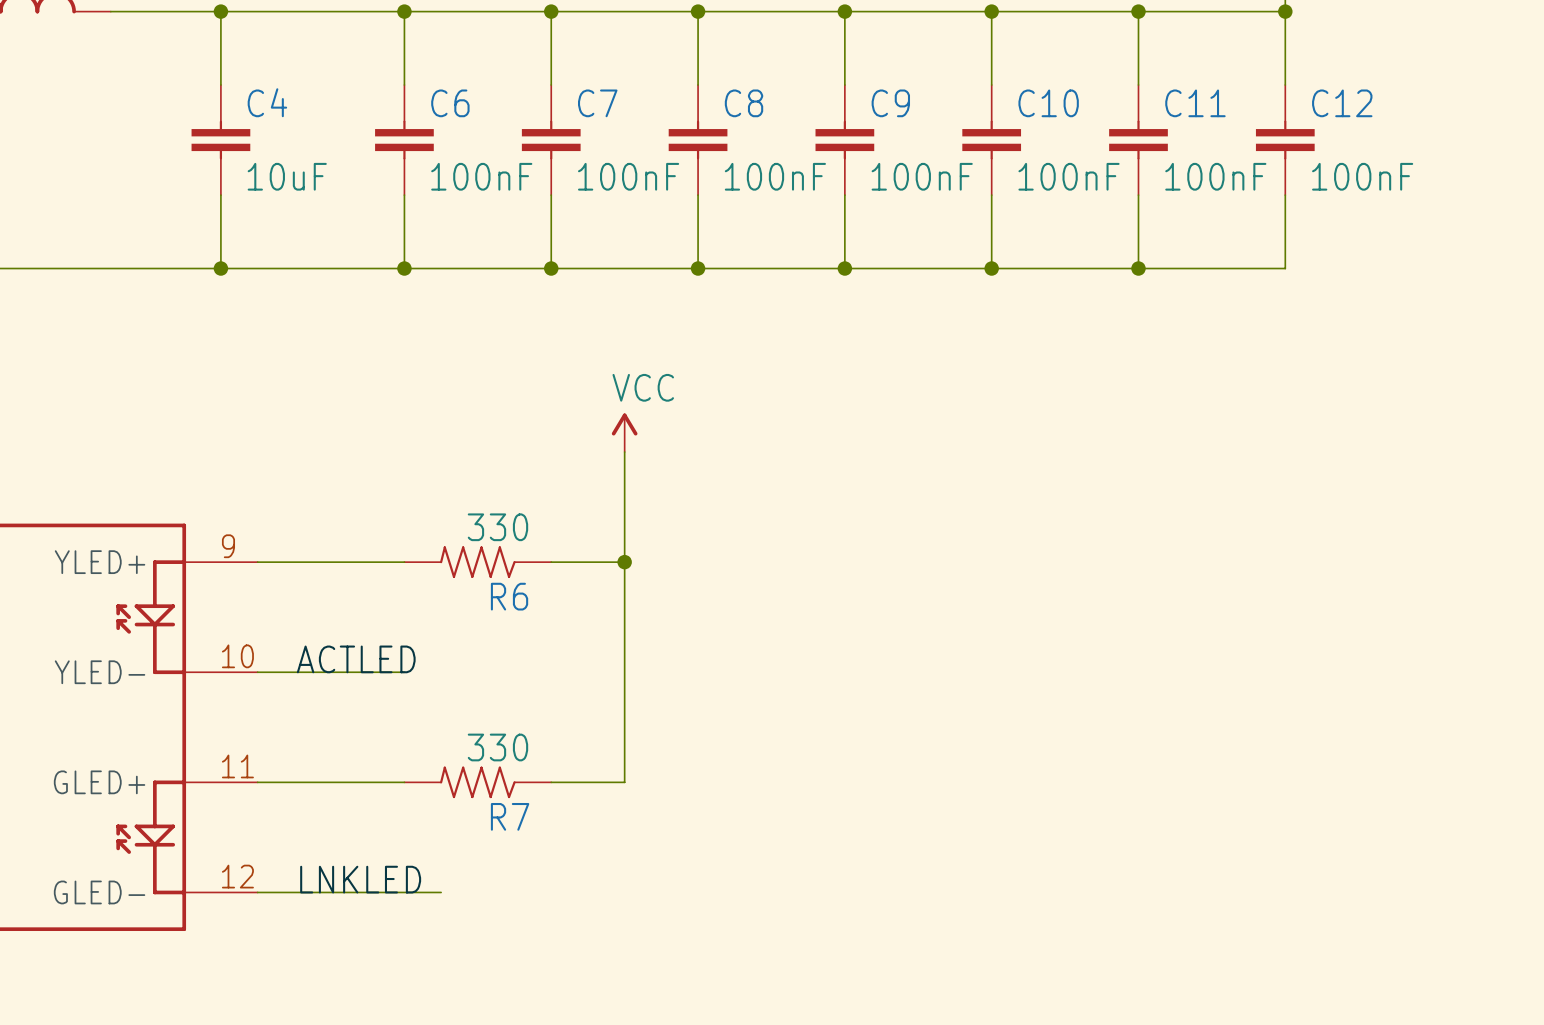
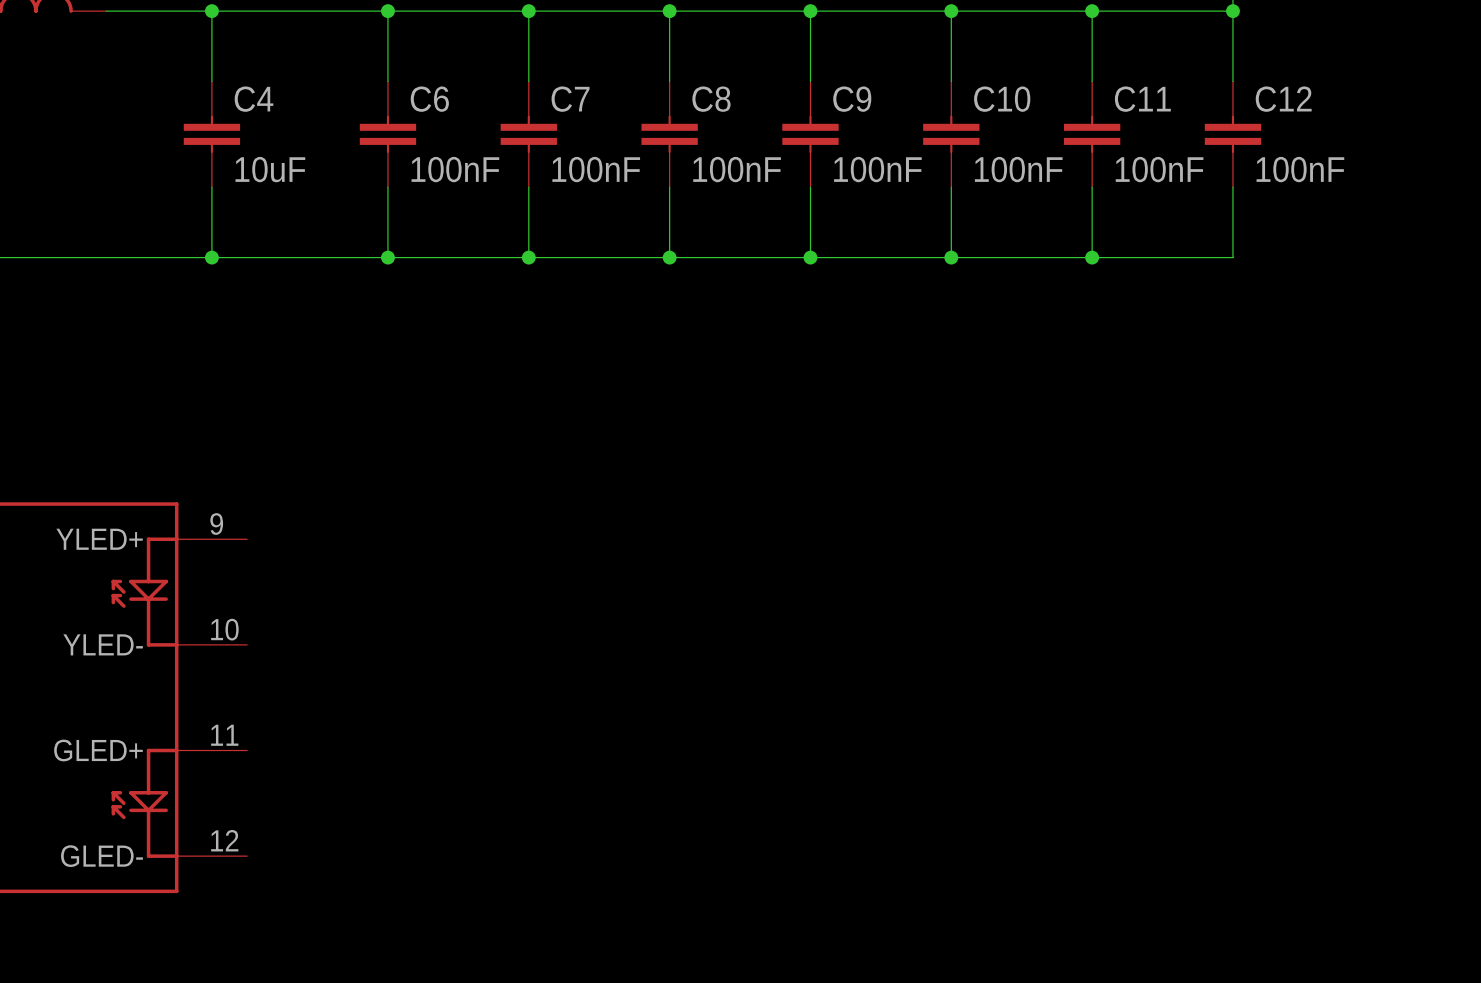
power symbol: VCC (624, 432) -> none
wire: (624, 452) (624, 782) (551, 782) -> none
wire: (257, 562) (404, 562) -> none
R6: 330 (477, 562) -> none
wire: (551, 562) (624, 562) -> none
junction: (624, 562) -> none
label: ACTLED (356, 659) -> none
wire: (257, 672) (404, 672) -> none
wire: (257, 782) (404, 782) -> none
R7: 330 (477, 782) -> none
label: LNKLED (360, 879) -> none
wire: (257, 892) (441, 892) -> none

